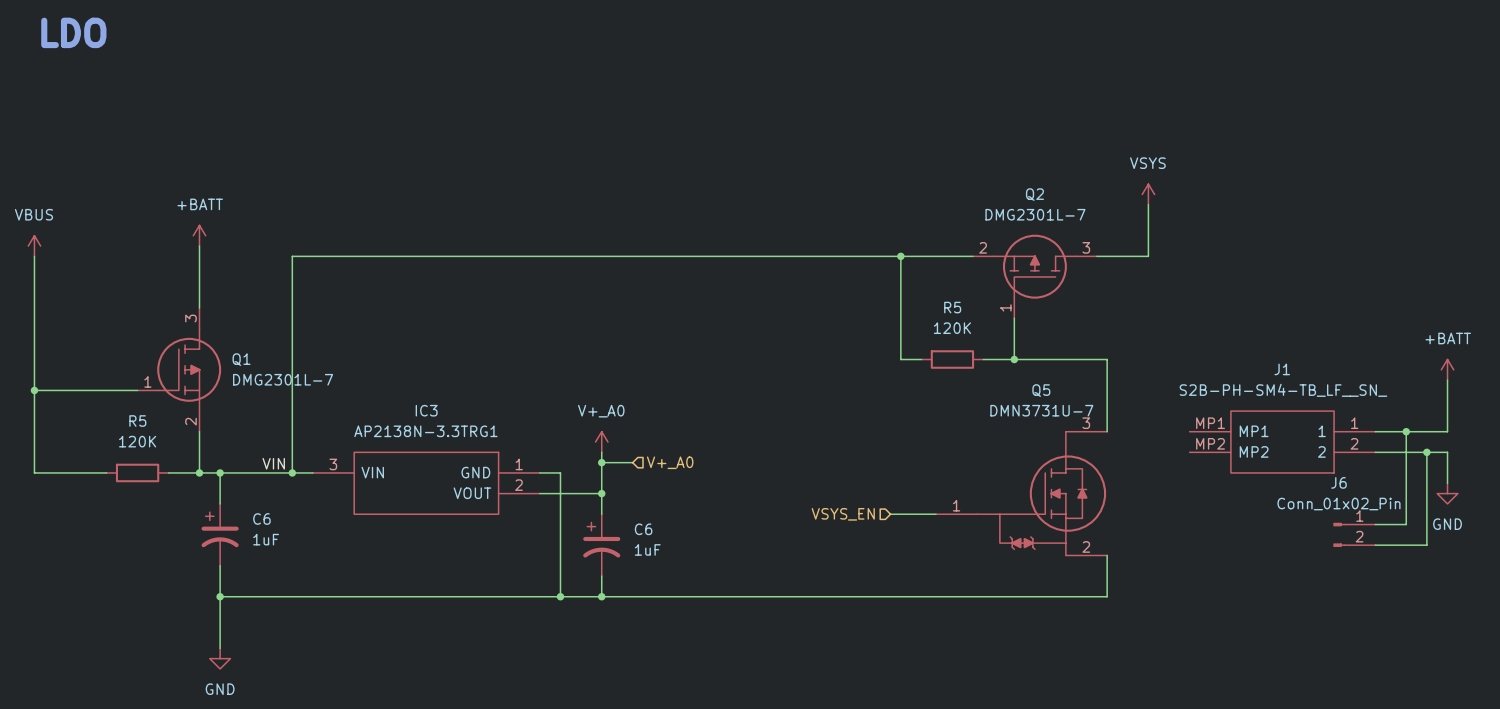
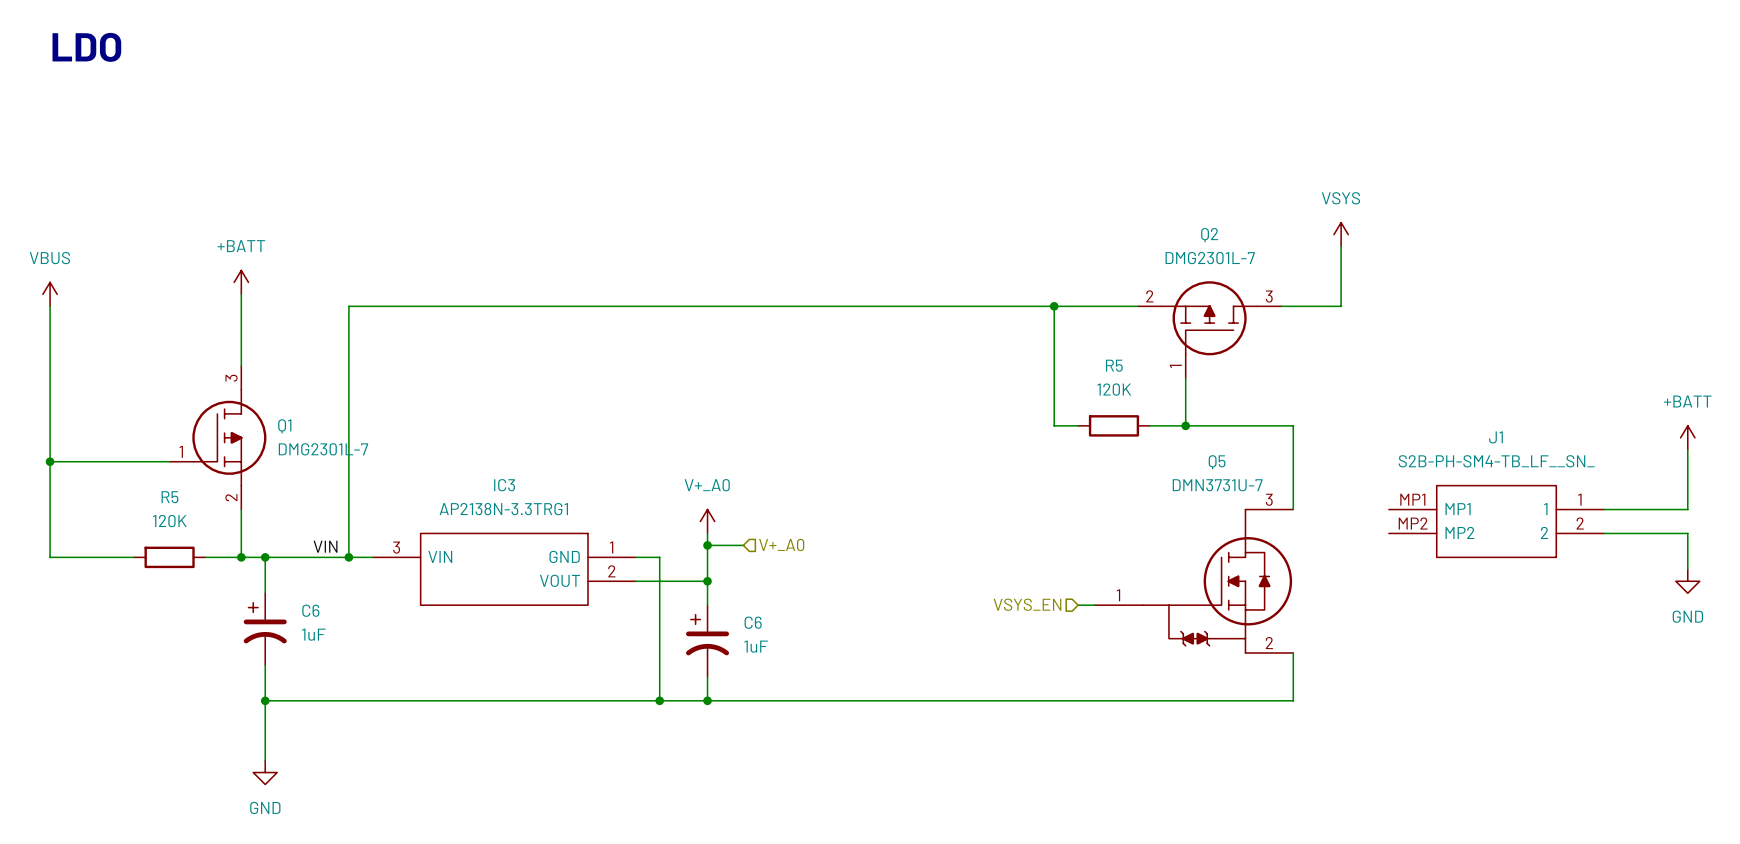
wire: (1406, 431) (1406, 524) (1375, 524) -> none
junction: (1406, 431) -> none
wire: (1426, 452) (1426, 545) (1375, 545) -> none
junction: (1426, 452) -> none
hierarchical label position: VSYS_EN (843, 514) -> VSYS_EN (1027, 604)
wire: (890, 514) (921, 514) -> none
J6: Conn_01x02_Pin (1354, 534) -> none

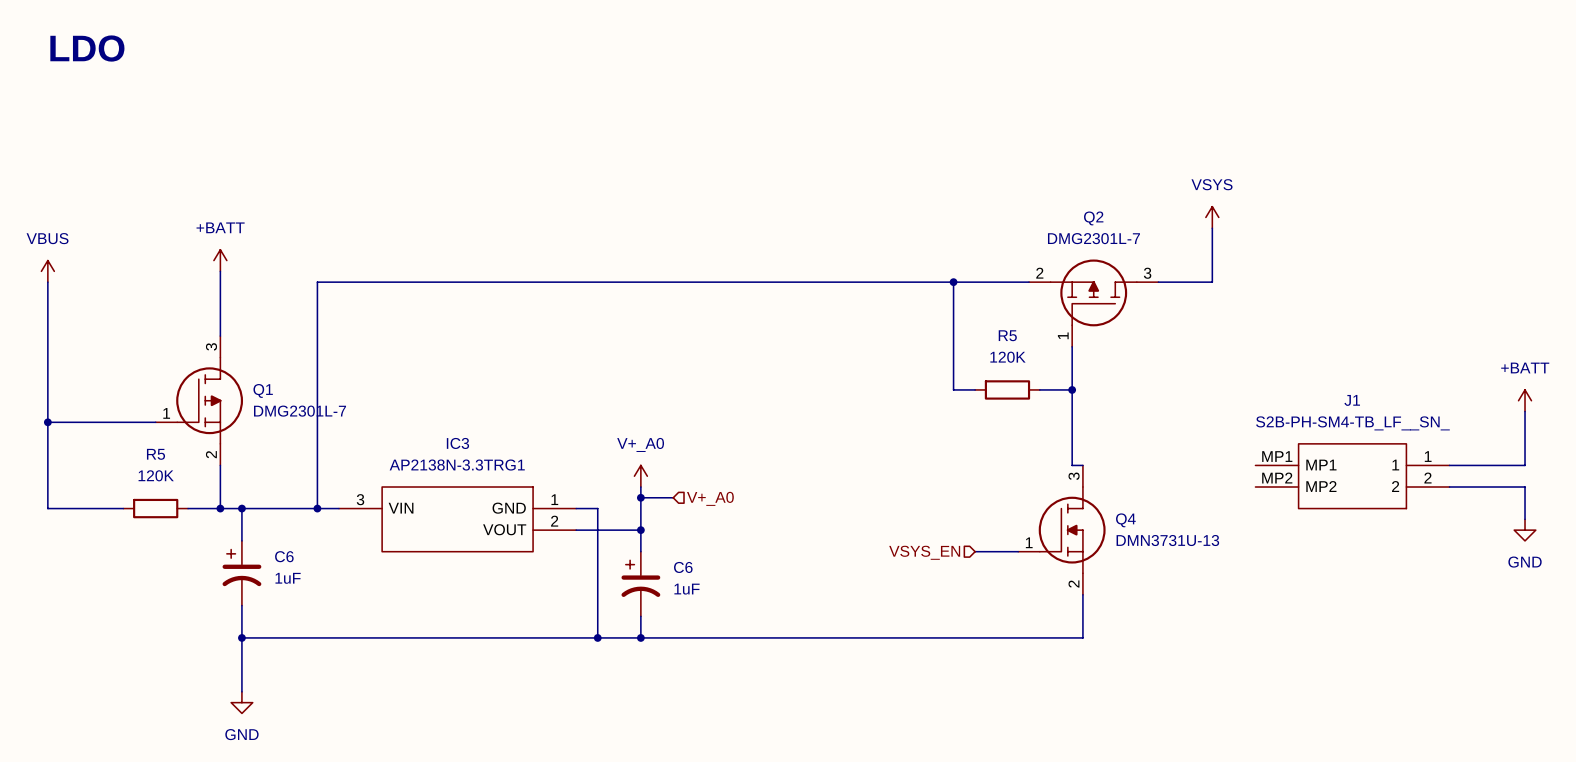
wire: (1185, 425) (1293, 425) (1293, 509) -> (1072, 389) (1072, 465) (1082, 465)
label: VIN (325, 546) -> none
Q4: none -> DMN3731U-13 (1061, 530)
Q5: DMN3731U-7 (1194, 581) -> none
wire: (1293, 653) (1293, 700) (1197, 700) -> (1082, 594) (1082, 637)

